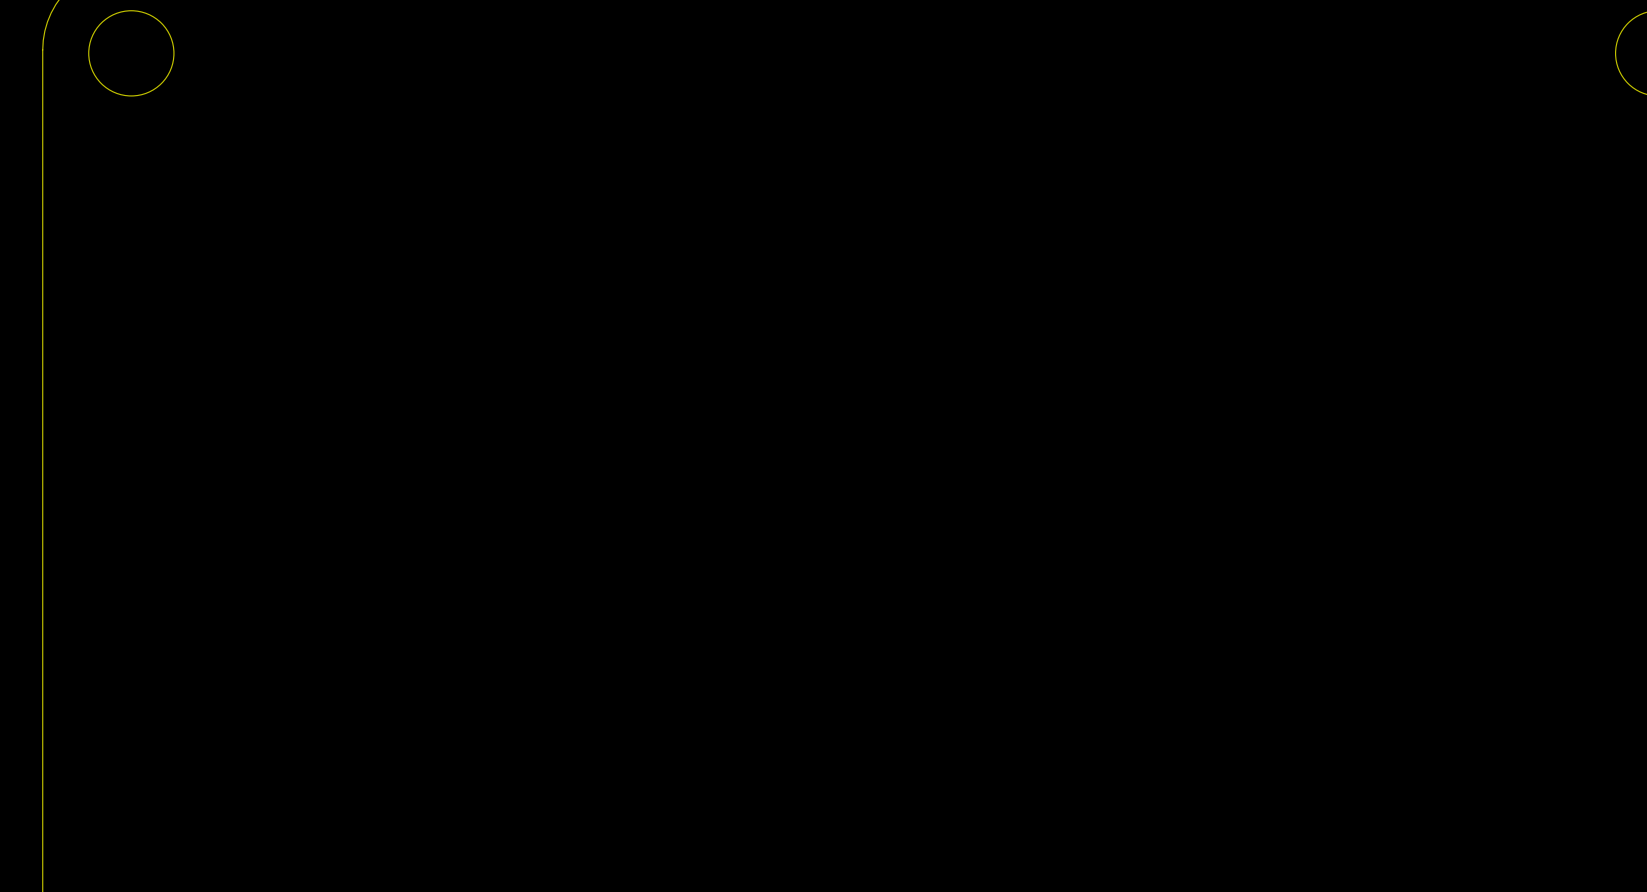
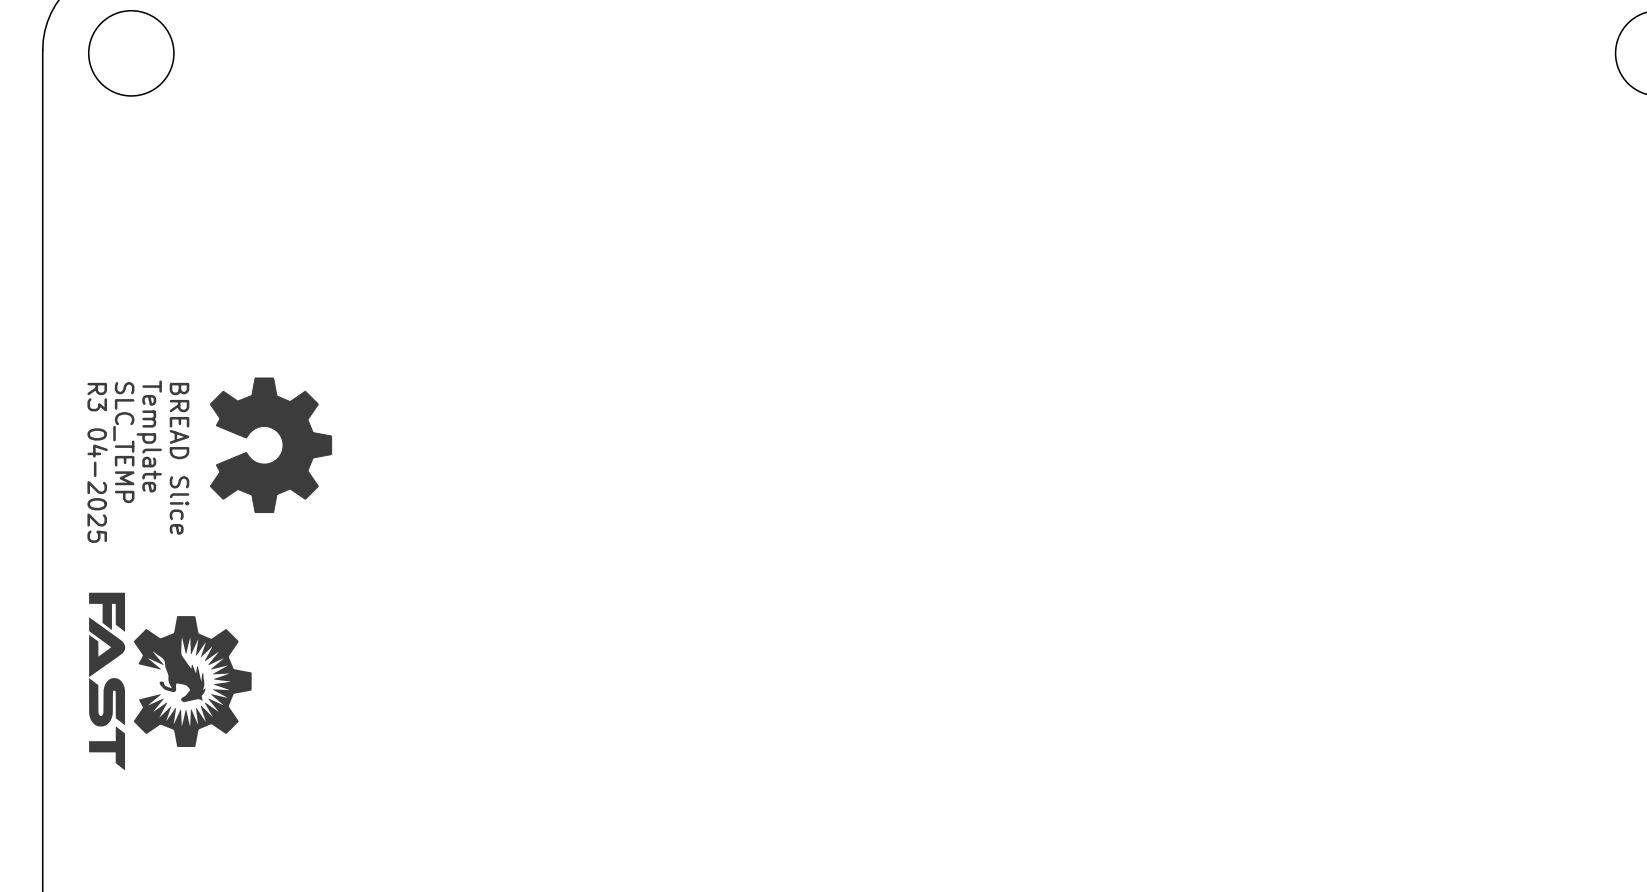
drawing: none -> [210, 377, 333, 514]
text: none -> Template (149, 436)
text: none -> SLC_TEMP (123, 442)
text: none -> BREAD Slice (179, 458)
text: none -> R3 04-2025 (97, 462)
drawing: none -> [89, 592, 252, 771]

